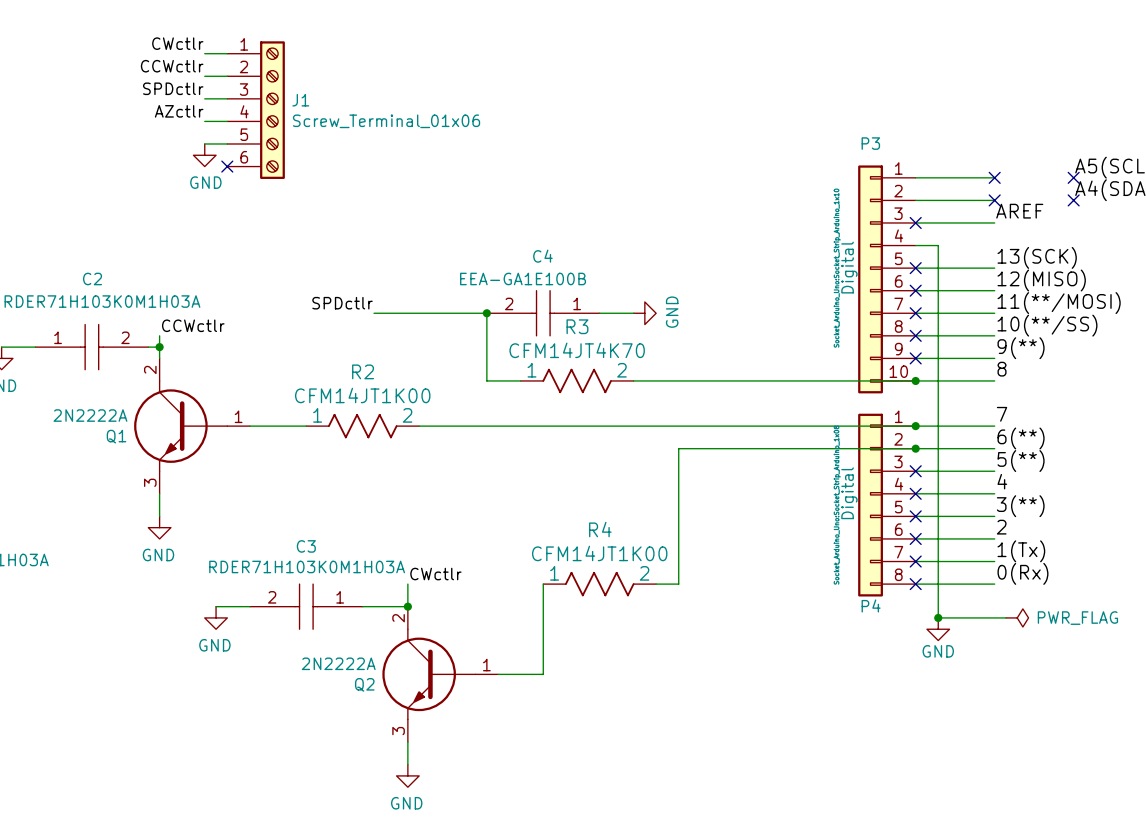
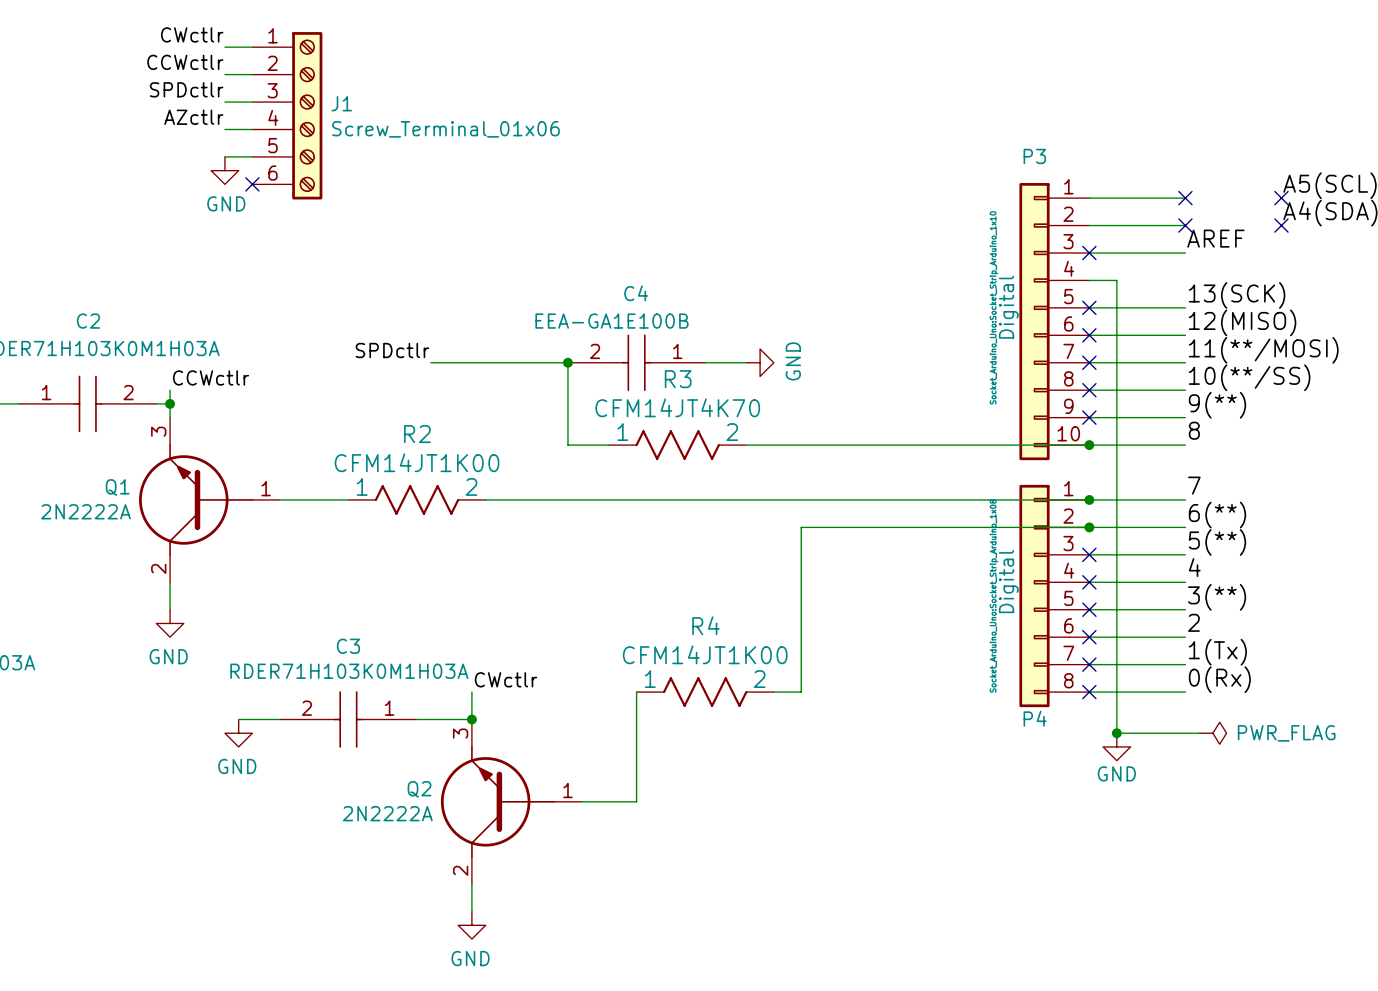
Q1 flip: as is (181, 426) -> up-down (196, 499)
Q2 flip: as is (429, 674) -> up-down (497, 801)

